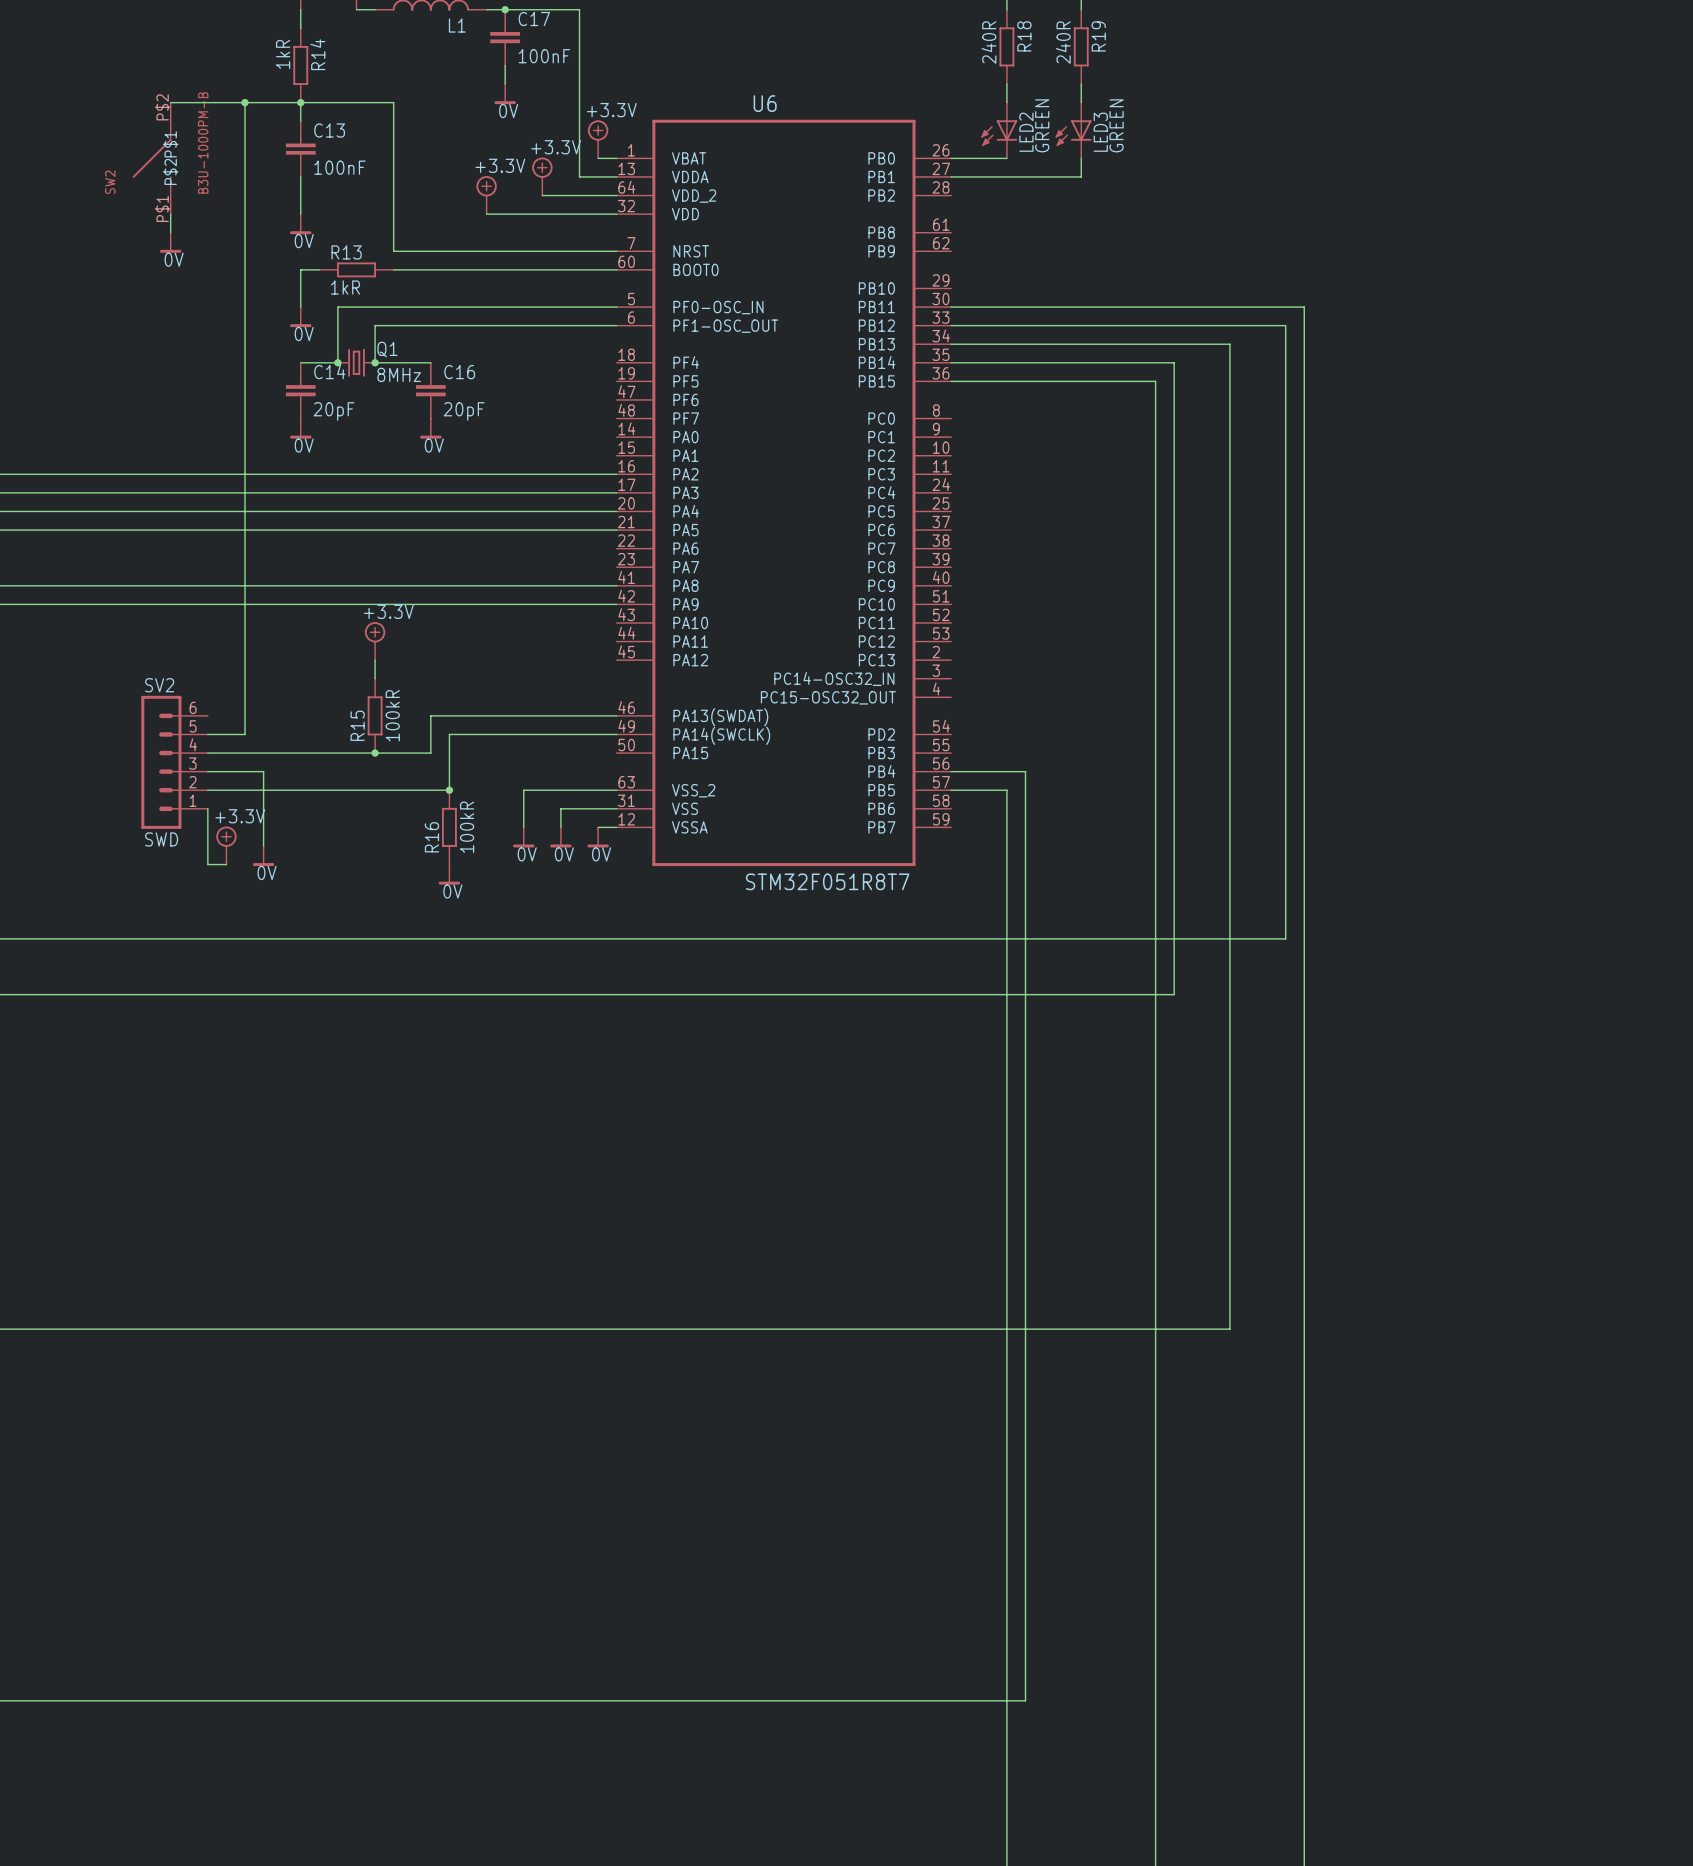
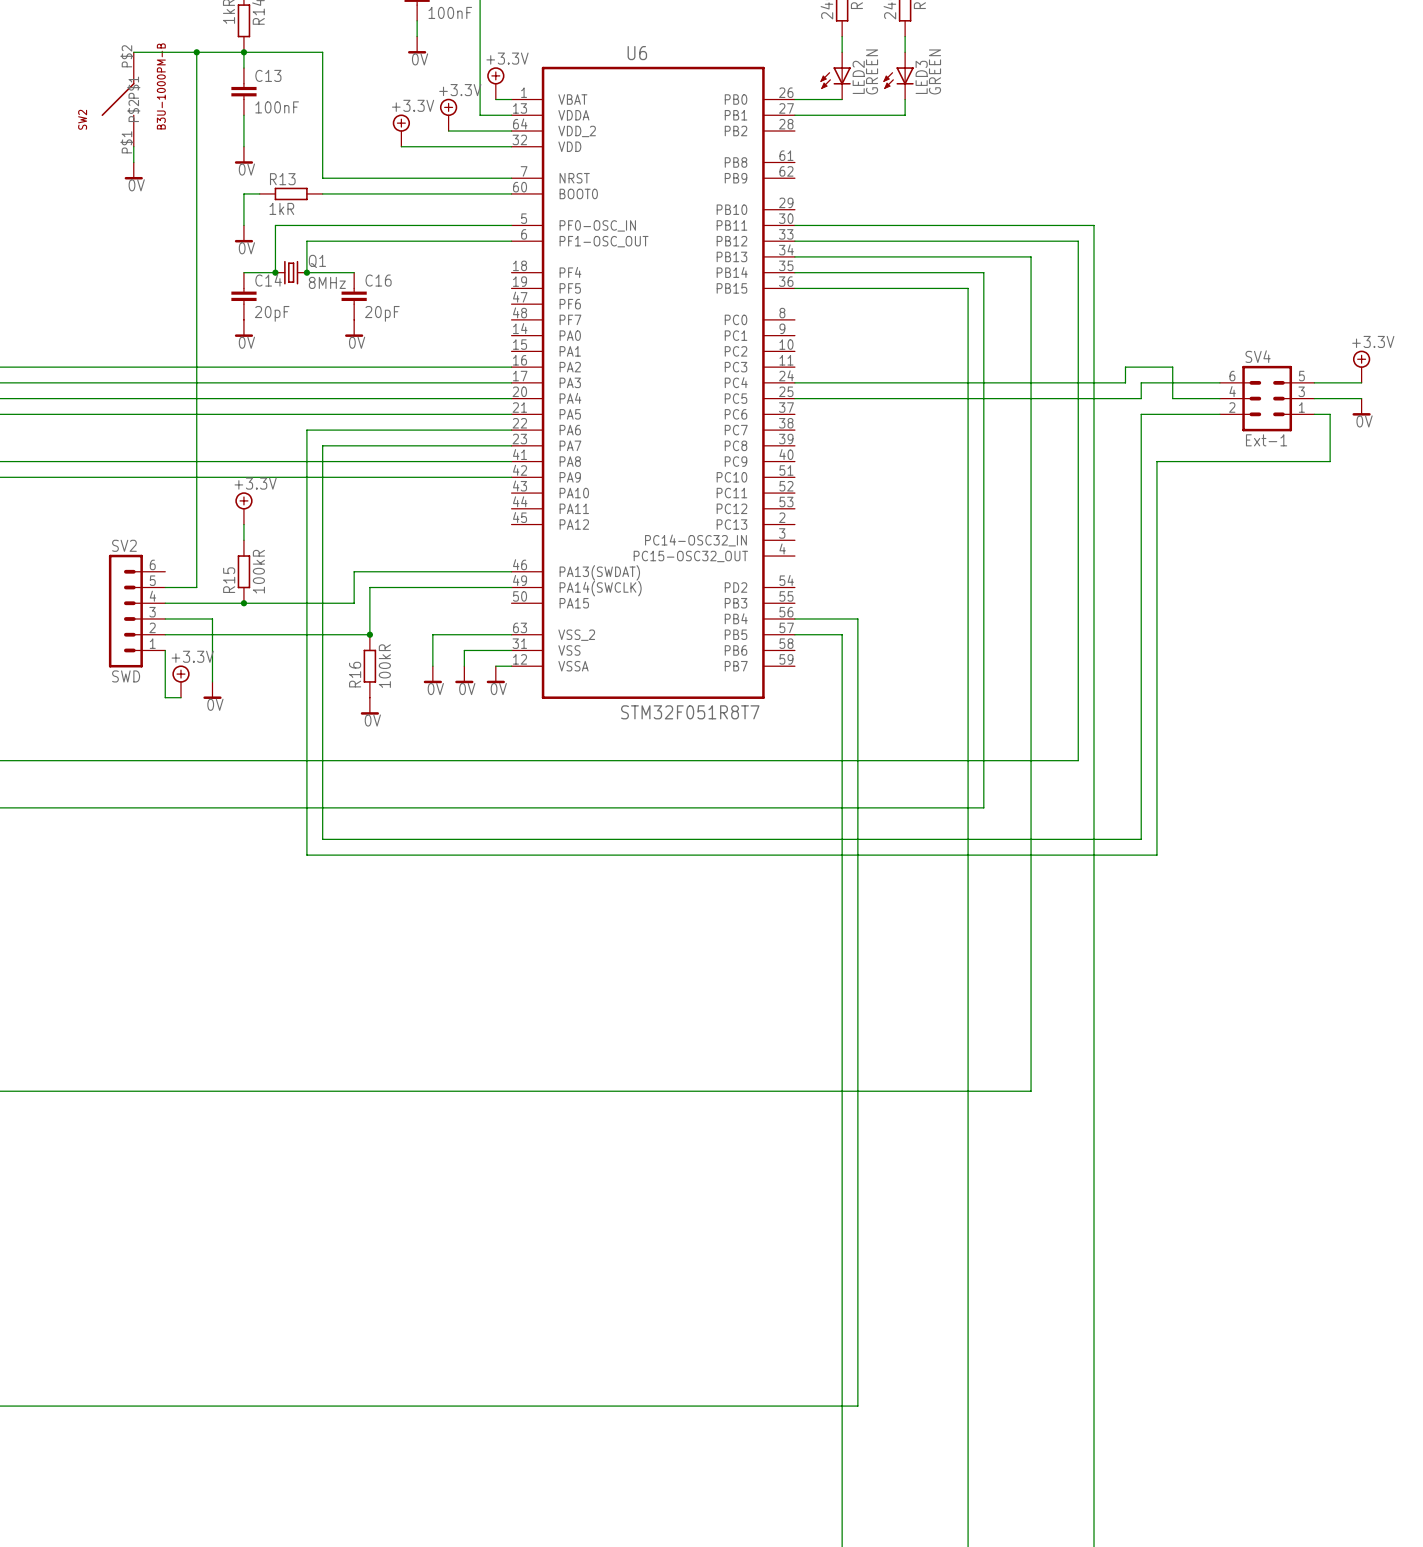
power symbol: none -> +3.3V (1361, 366)
wire: none -> (794, 382) (1125, 382) (1125, 367) (1172, 367) (1172, 398) (1219, 398)
wire: none -> (1219, 382) (1141, 382) (1141, 398) (794, 398)
wire: none -> (1314, 382) (1361, 382)
SV4: none -> Ext-1 (1267, 398)
wire: none -> (1314, 398) (1361, 398)
power symbol: none -> 0V (1361, 407)
wire: none -> (1219, 414) (1141, 414) (1141, 839) (322, 839) (322, 445) (511, 445)
wire: none -> (1314, 414) (1330, 414) (1330, 461) (1156, 461) (1156, 855) (306, 855) (306, 540)
wire: none -> (511, 430) (306, 430) (306, 524)
power symbol position: +3.3V (375, 641) -> +3.3V (243, 508)
wire: none -> (243, 524) (243, 540)
R15 position: (375, 715) -> (243, 571)
junction: none -> (243, 603)
junction: (375, 753) -> none

